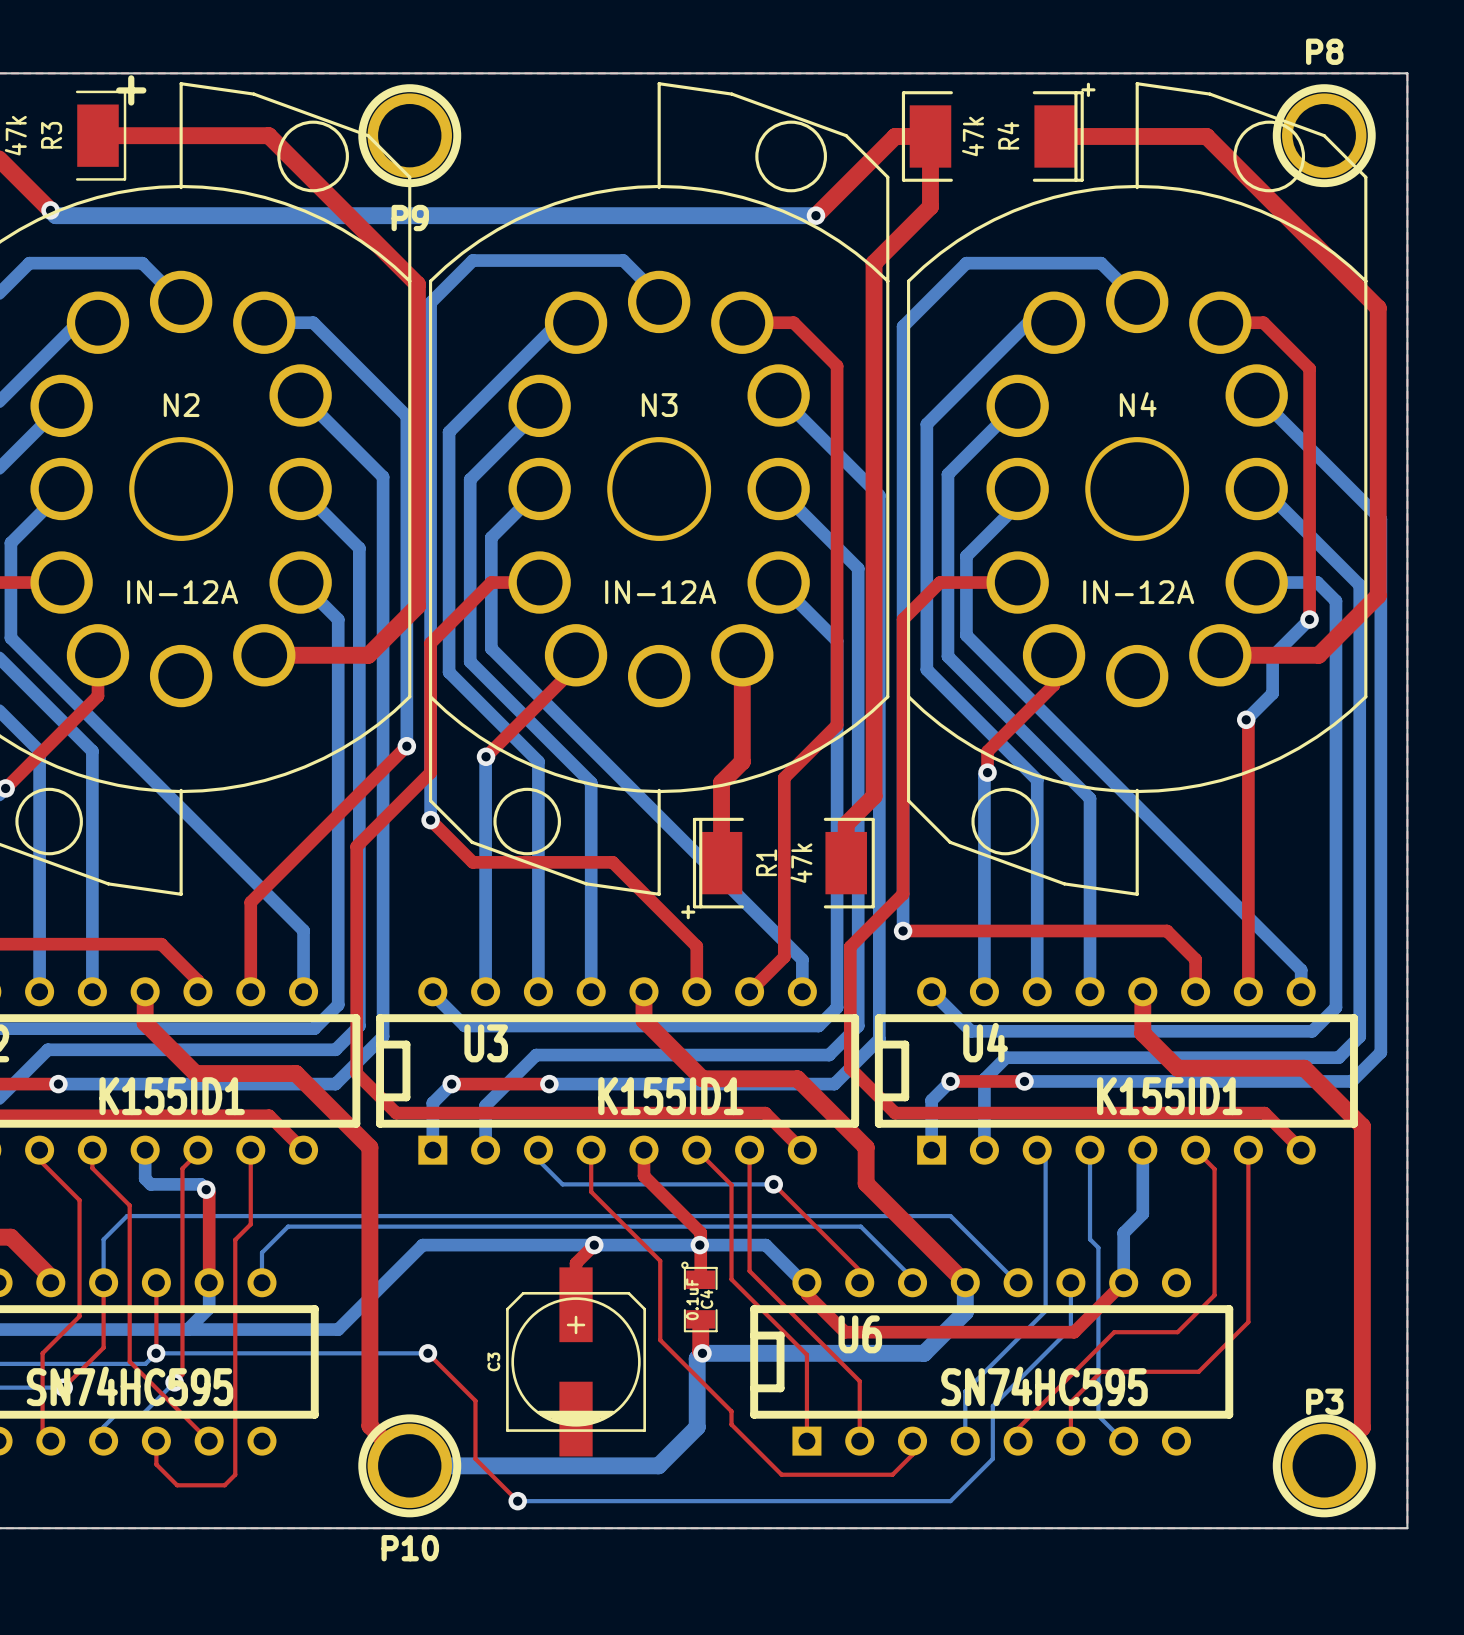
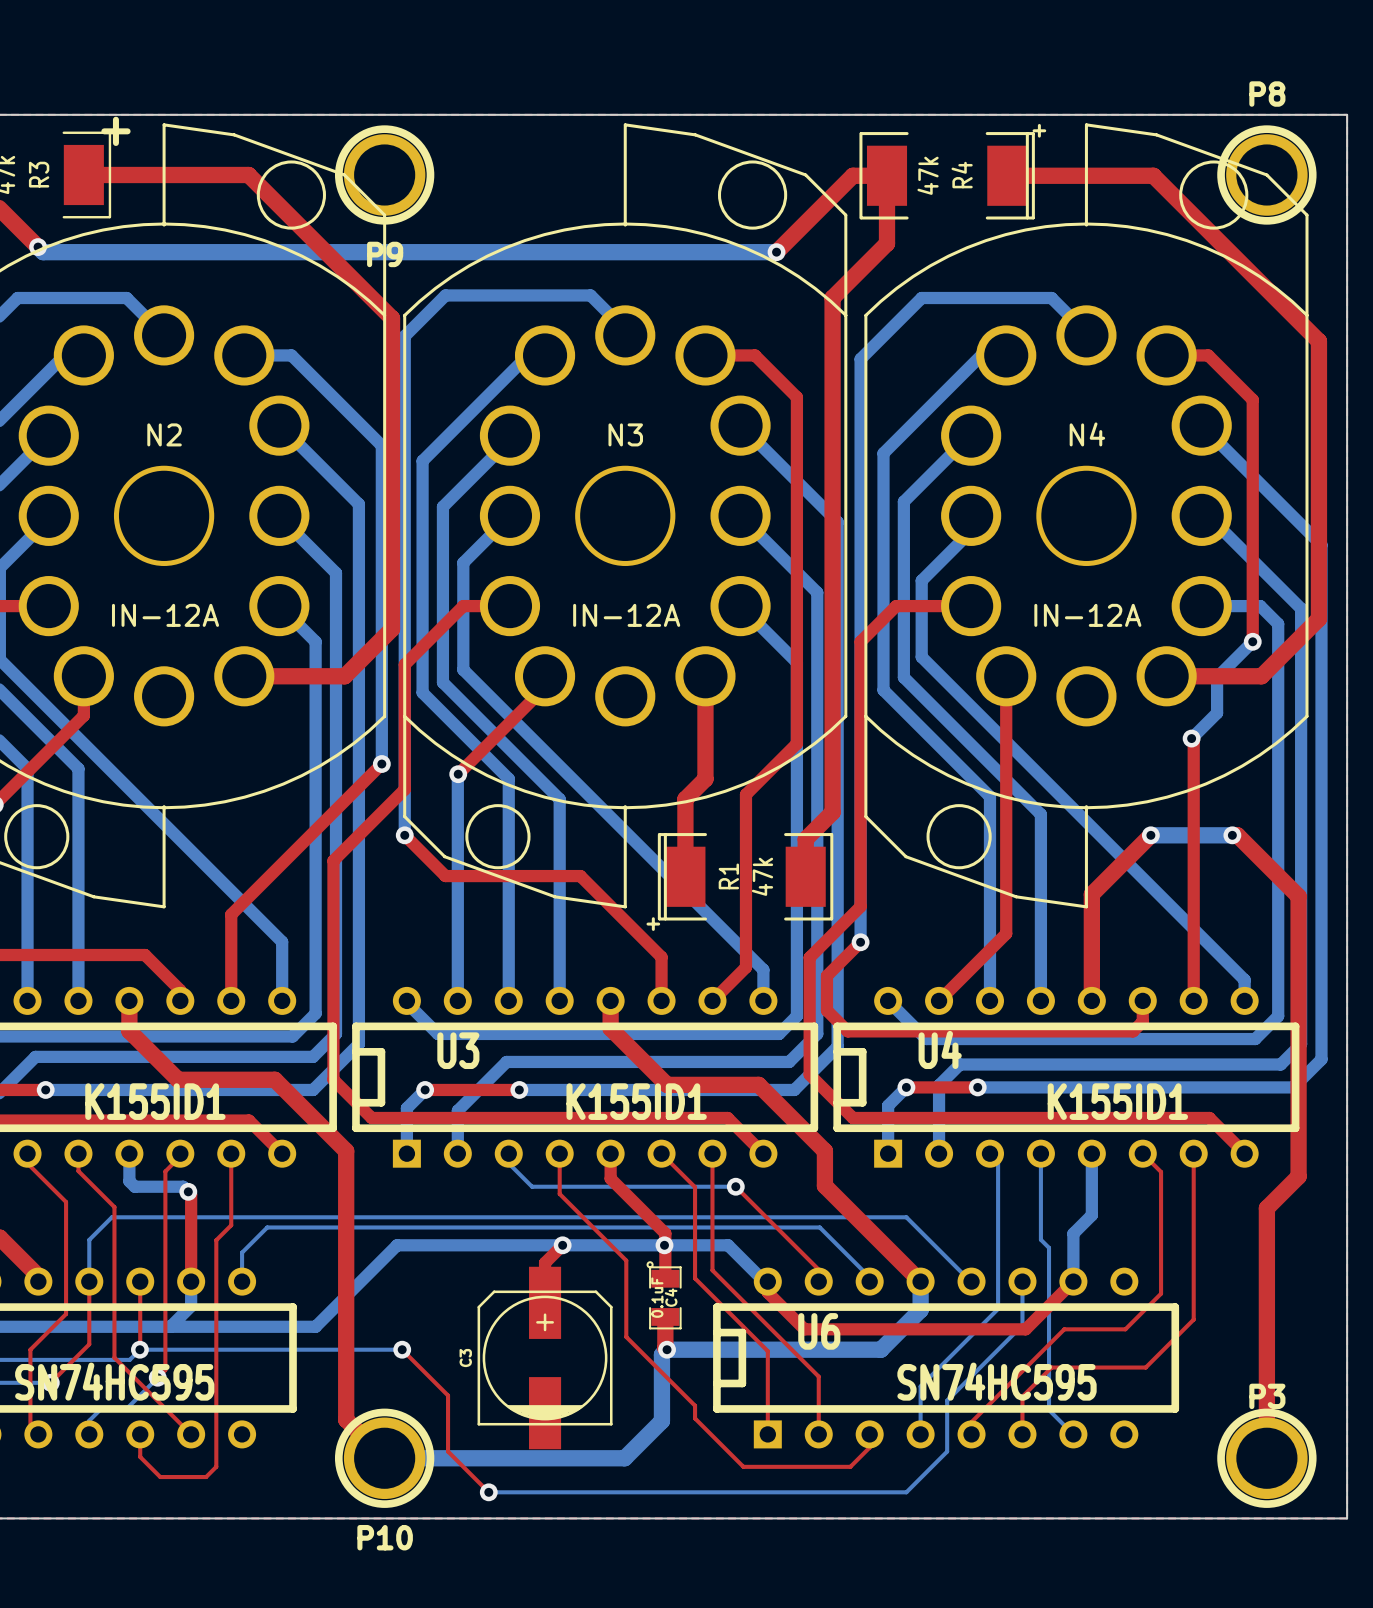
top track: (1054, 684) (987, 751) (987, 772) -> (1006, 704) (1006, 933) (939, 1000)
bottom track: (987, 772) (984, 775) (984, 991) -> none
via: (987, 772) -> none
bottom track: none -> (1150, 835) (1232, 835)
top track: none -> (1150, 835) (1091, 894) (1091, 1000)
via: none -> (1150, 835)
via: none -> (1232, 835)
top track: (903, 930) (1167, 930) (1195, 959) (1195, 991) -> (860, 942) (826, 975) (826, 1010) (847, 1031) (1133, 1031) (1142, 1021) (1142, 1000)
top track: (1142, 991) (1142, 1033) (1177, 1068) (1304, 1068) (1362, 1126) (1362, 1427) (1324, 1465) -> (1232, 835) (1237, 835) (1298, 896) (1298, 1176) (1266, 1208) (1266, 1458)

